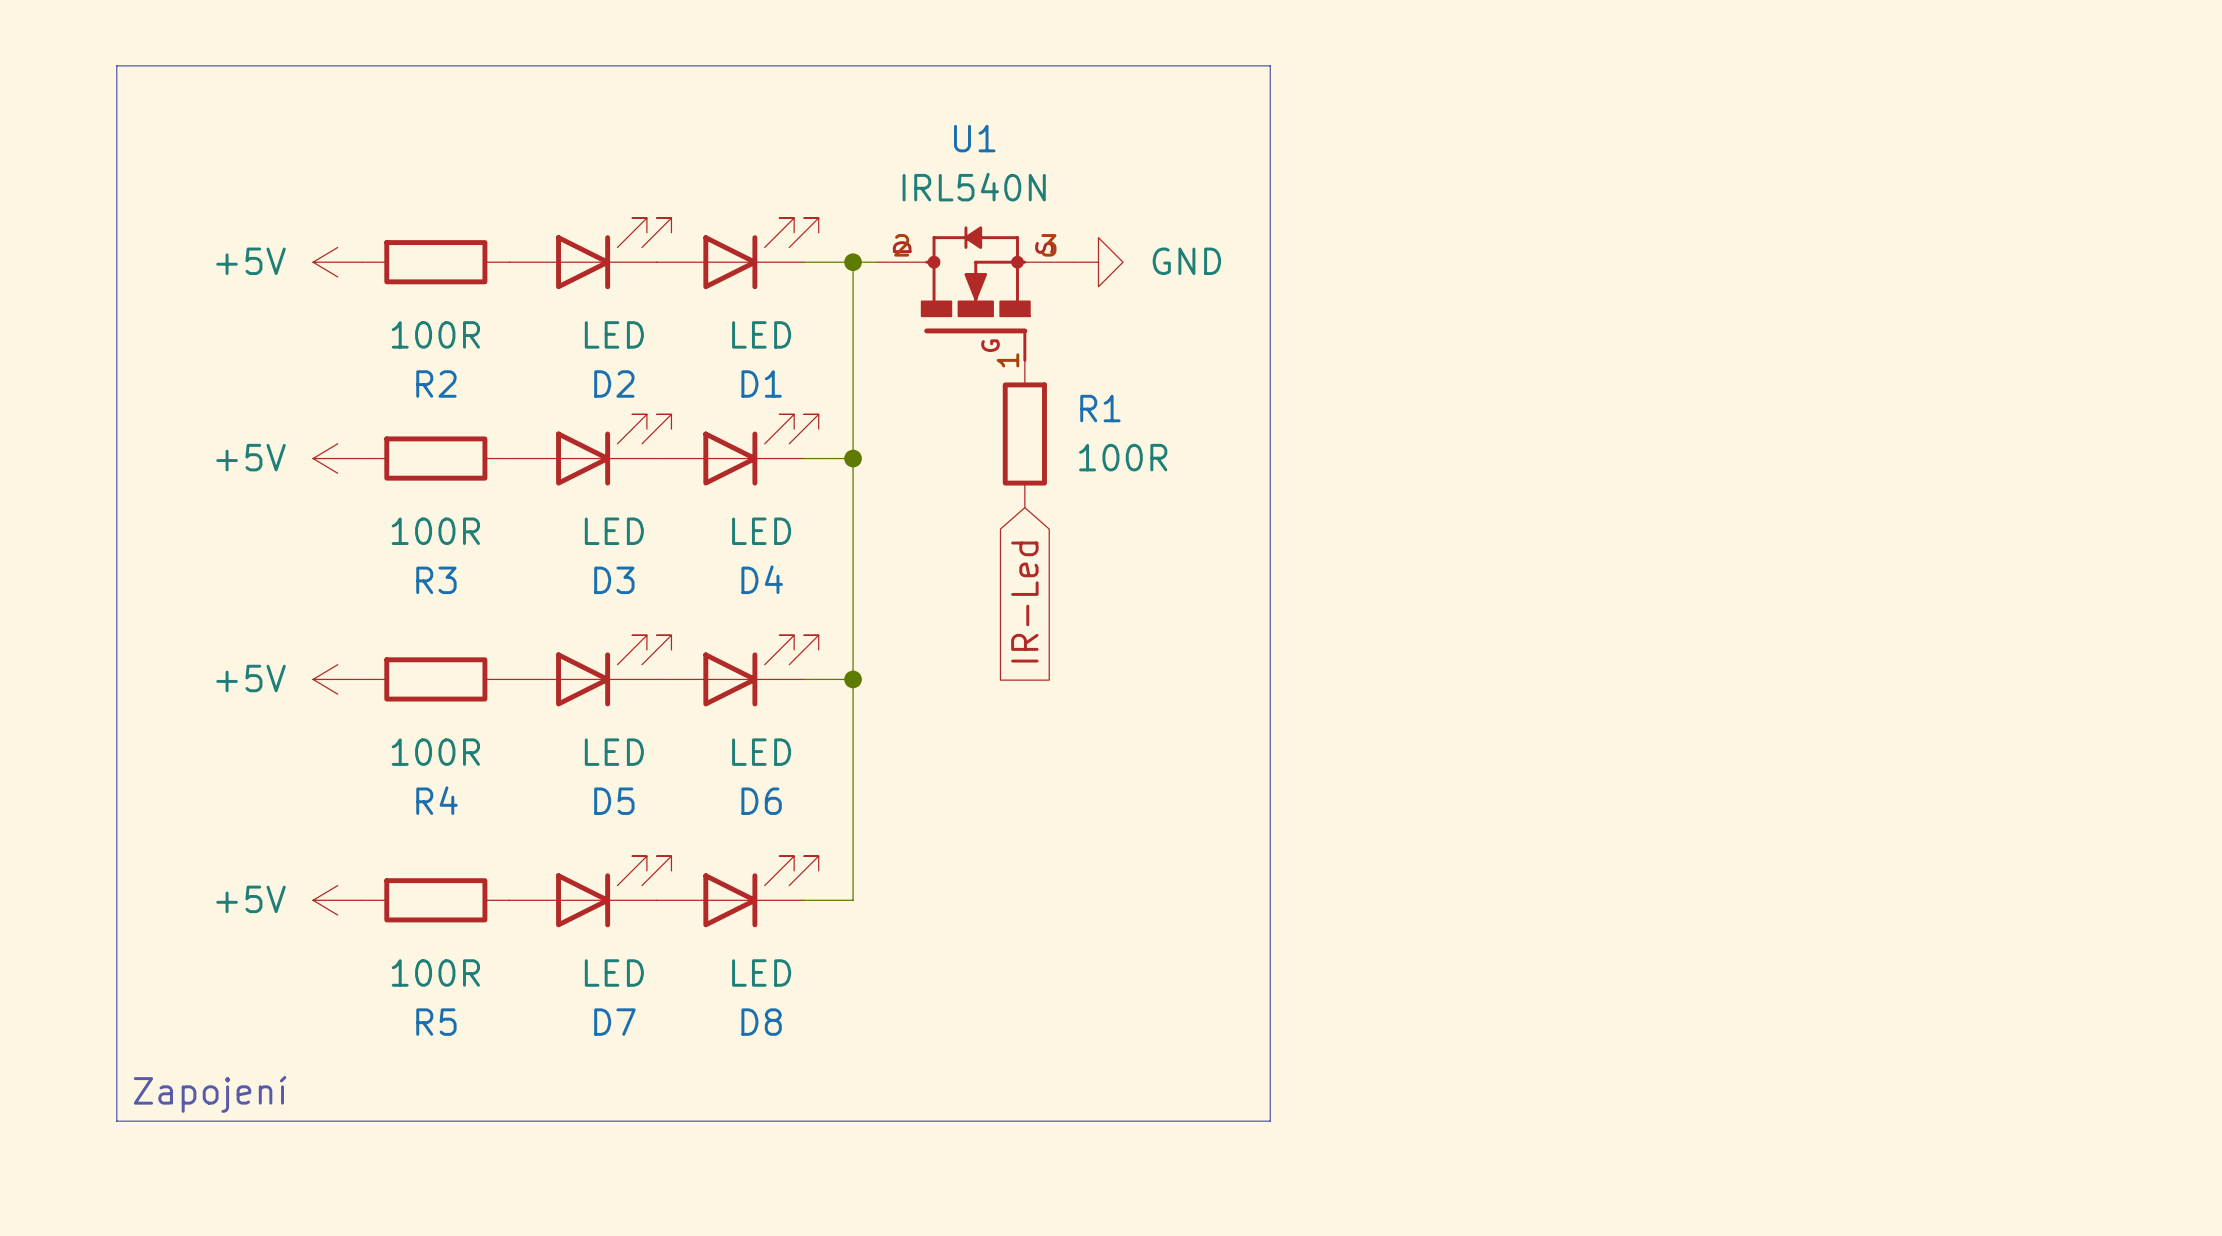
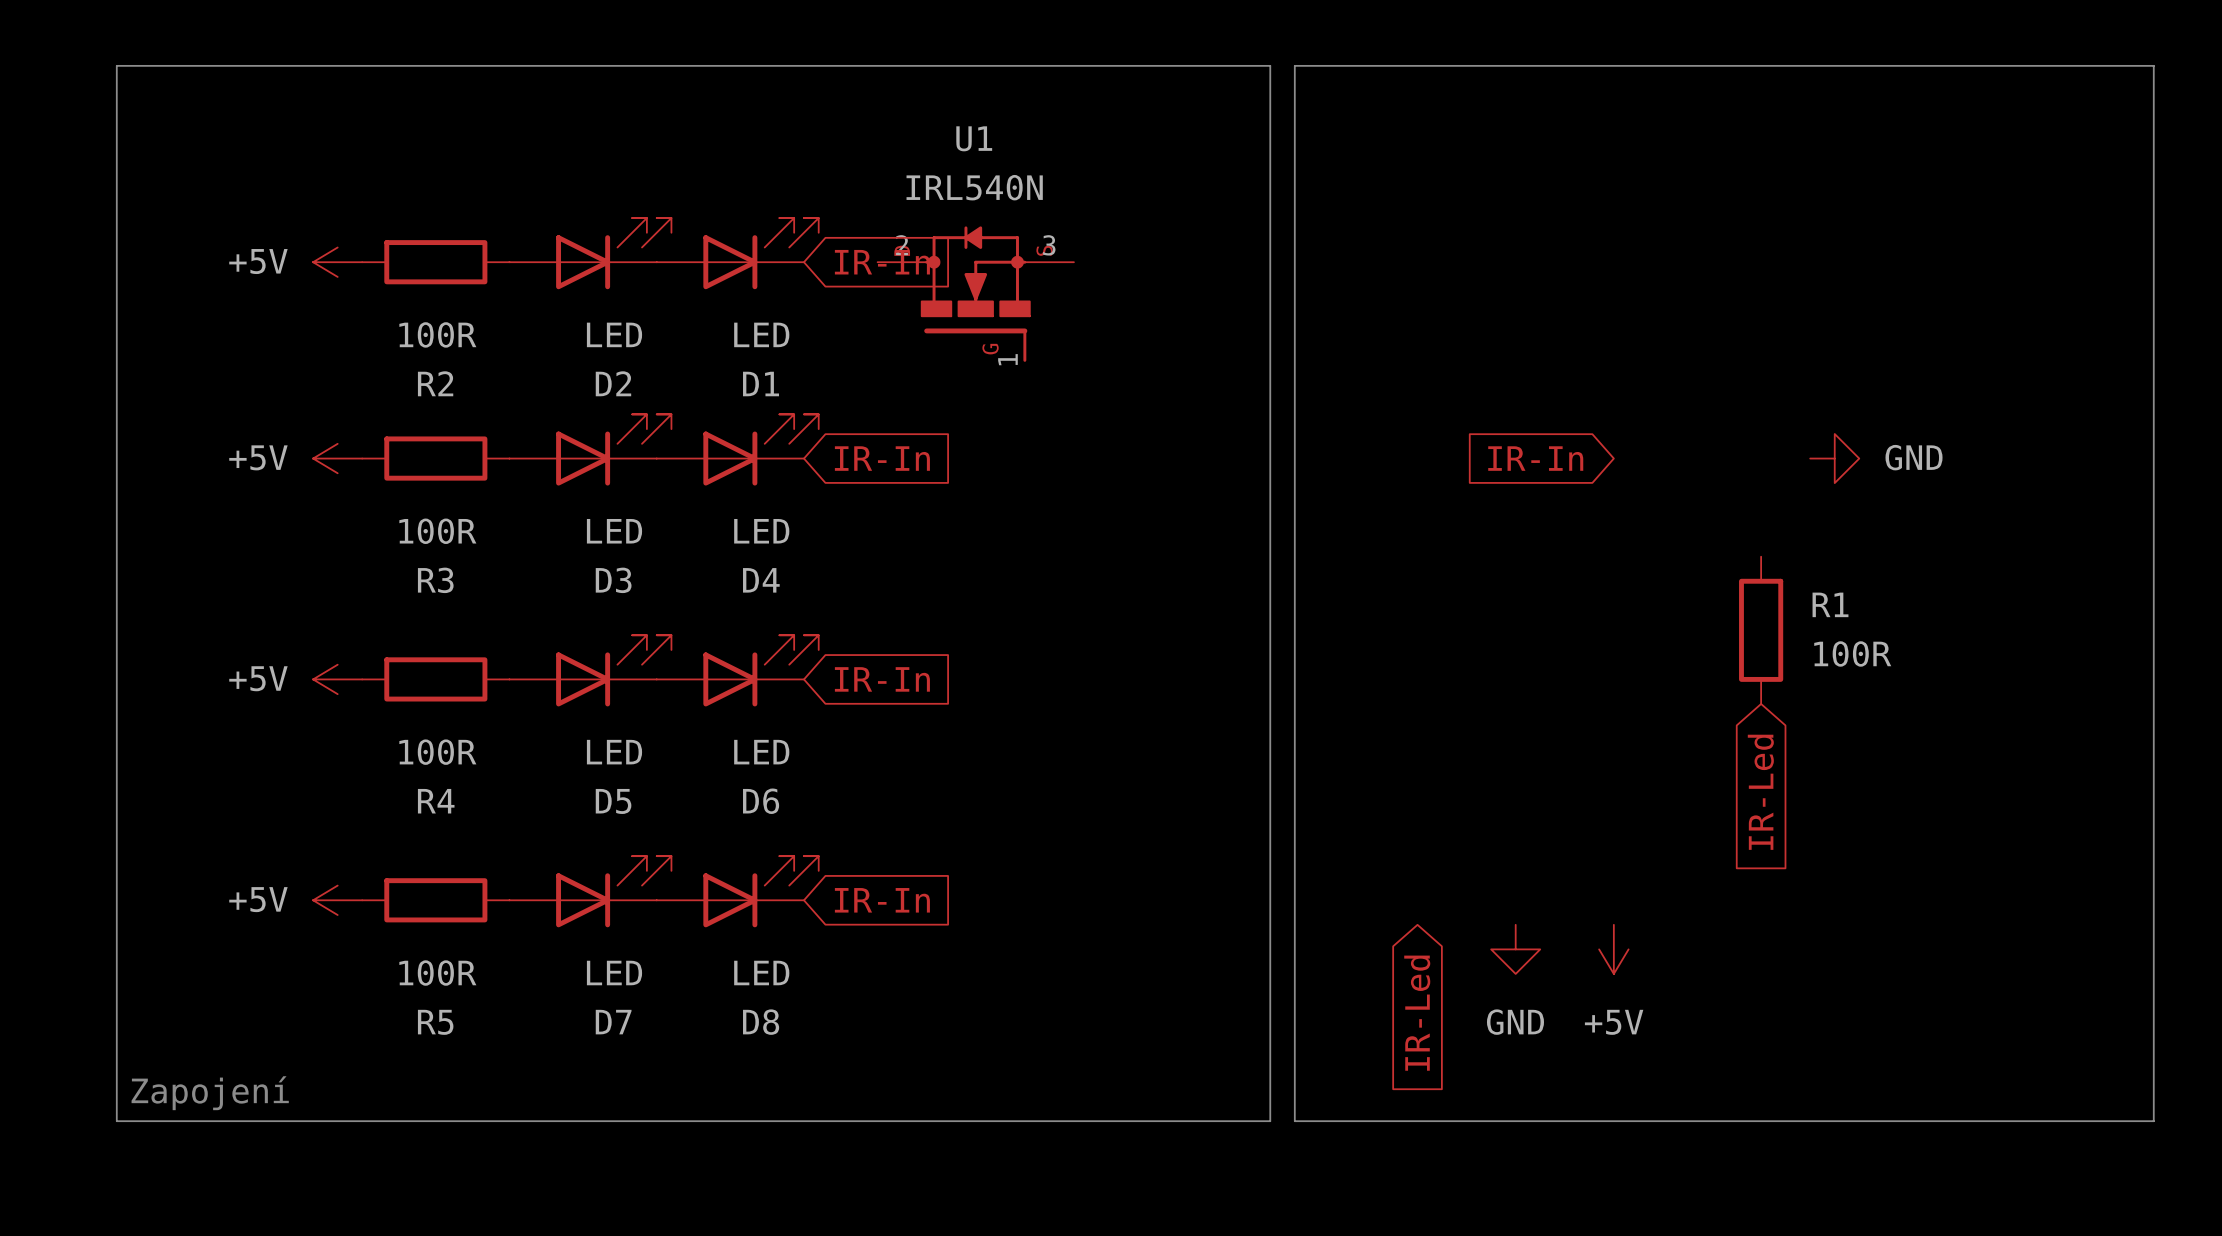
line: none -> (1294, 65) (2153, 65) (2153, 1121) (1294, 1121) (1294, 65)
wire: (803, 262) (877, 262) -> none
wire: (853, 262) (853, 900) (803, 900) -> none
junction: (853, 262) -> none
global label: none -> IR-In (882, 262)
power symbol: GND (1098, 262) -> none
R1 position: (1024, 434) -> (1761, 630)
wire: (803, 458) (853, 458) -> none
junction: (853, 458) -> none
global label: none -> IR-In (882, 458)
global label: none -> IR-In (1535, 458)
power symbol: none -> GND (1834, 458)
global label: IR-Led (1024, 602) -> none
wire: (803, 679) (853, 679) -> none
junction: (853, 679) -> none
global label: none -> IR-In (882, 679)
global label: none -> IR-Led (1760, 792)
global label: none -> IR-In (882, 900)
power symbol: none -> GND (1515, 949)
power symbol: none -> +5V (1613, 949)
global label: none -> IR-Led (1417, 1013)

